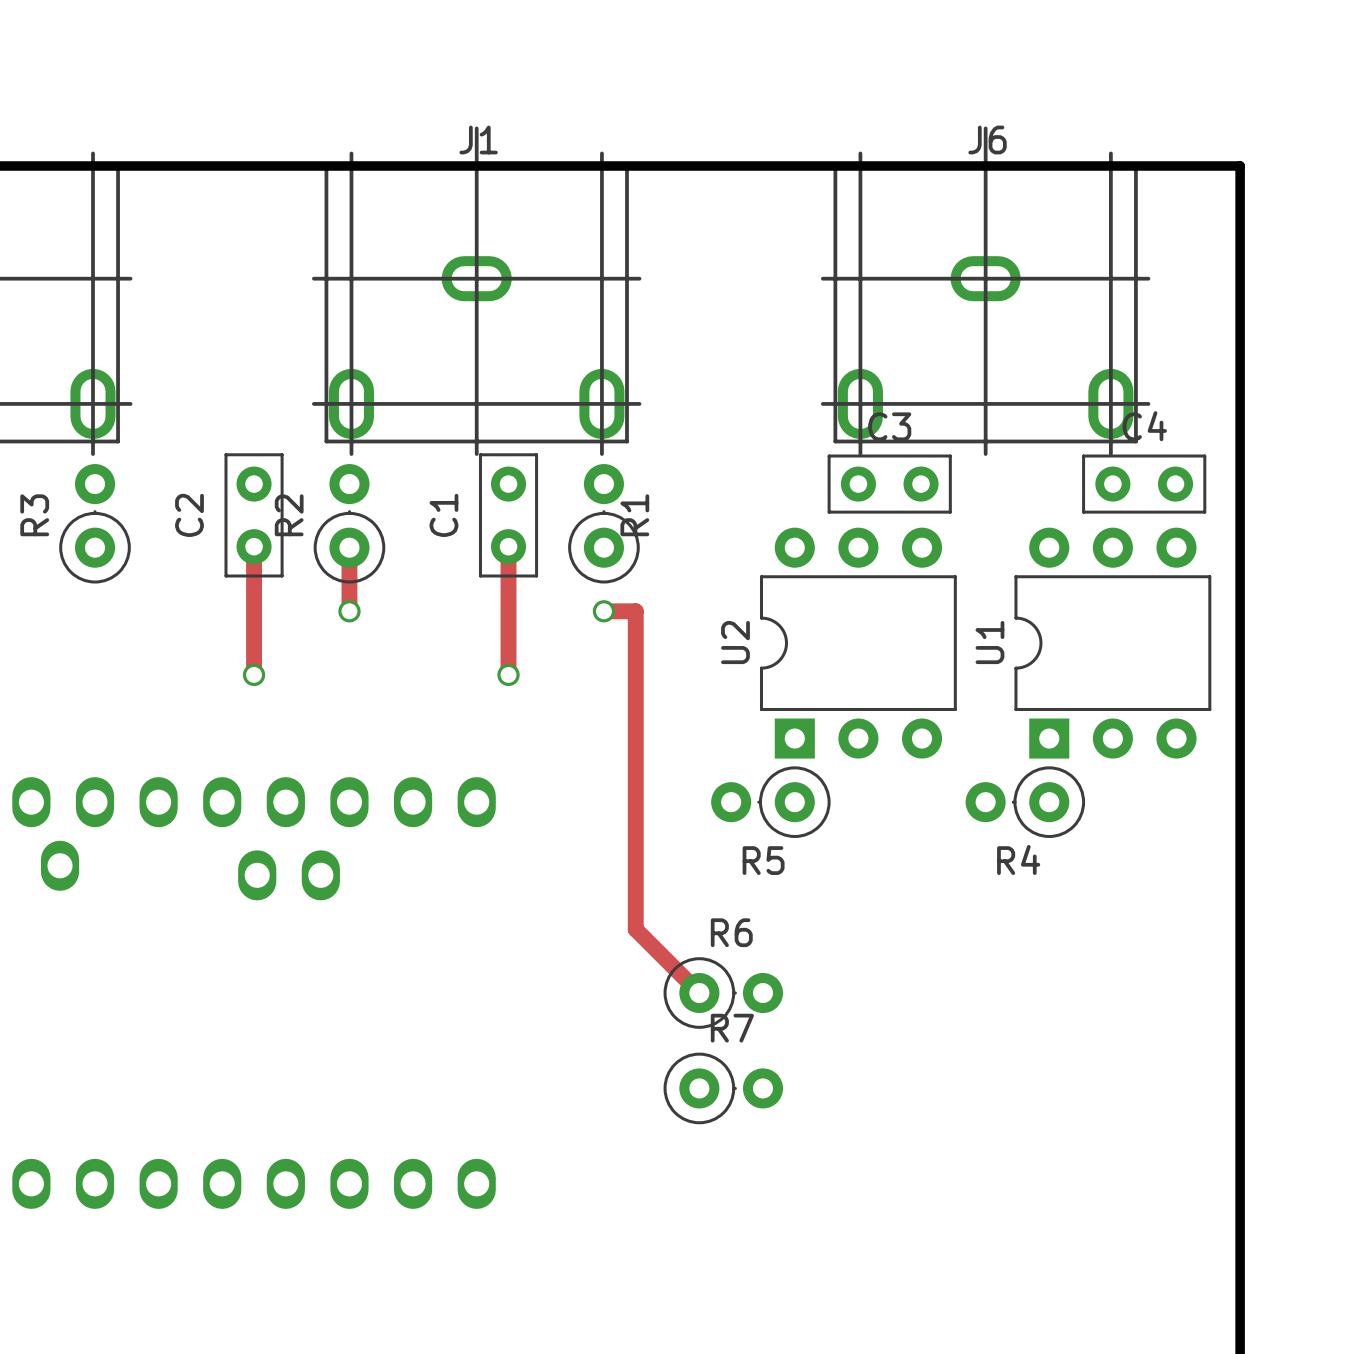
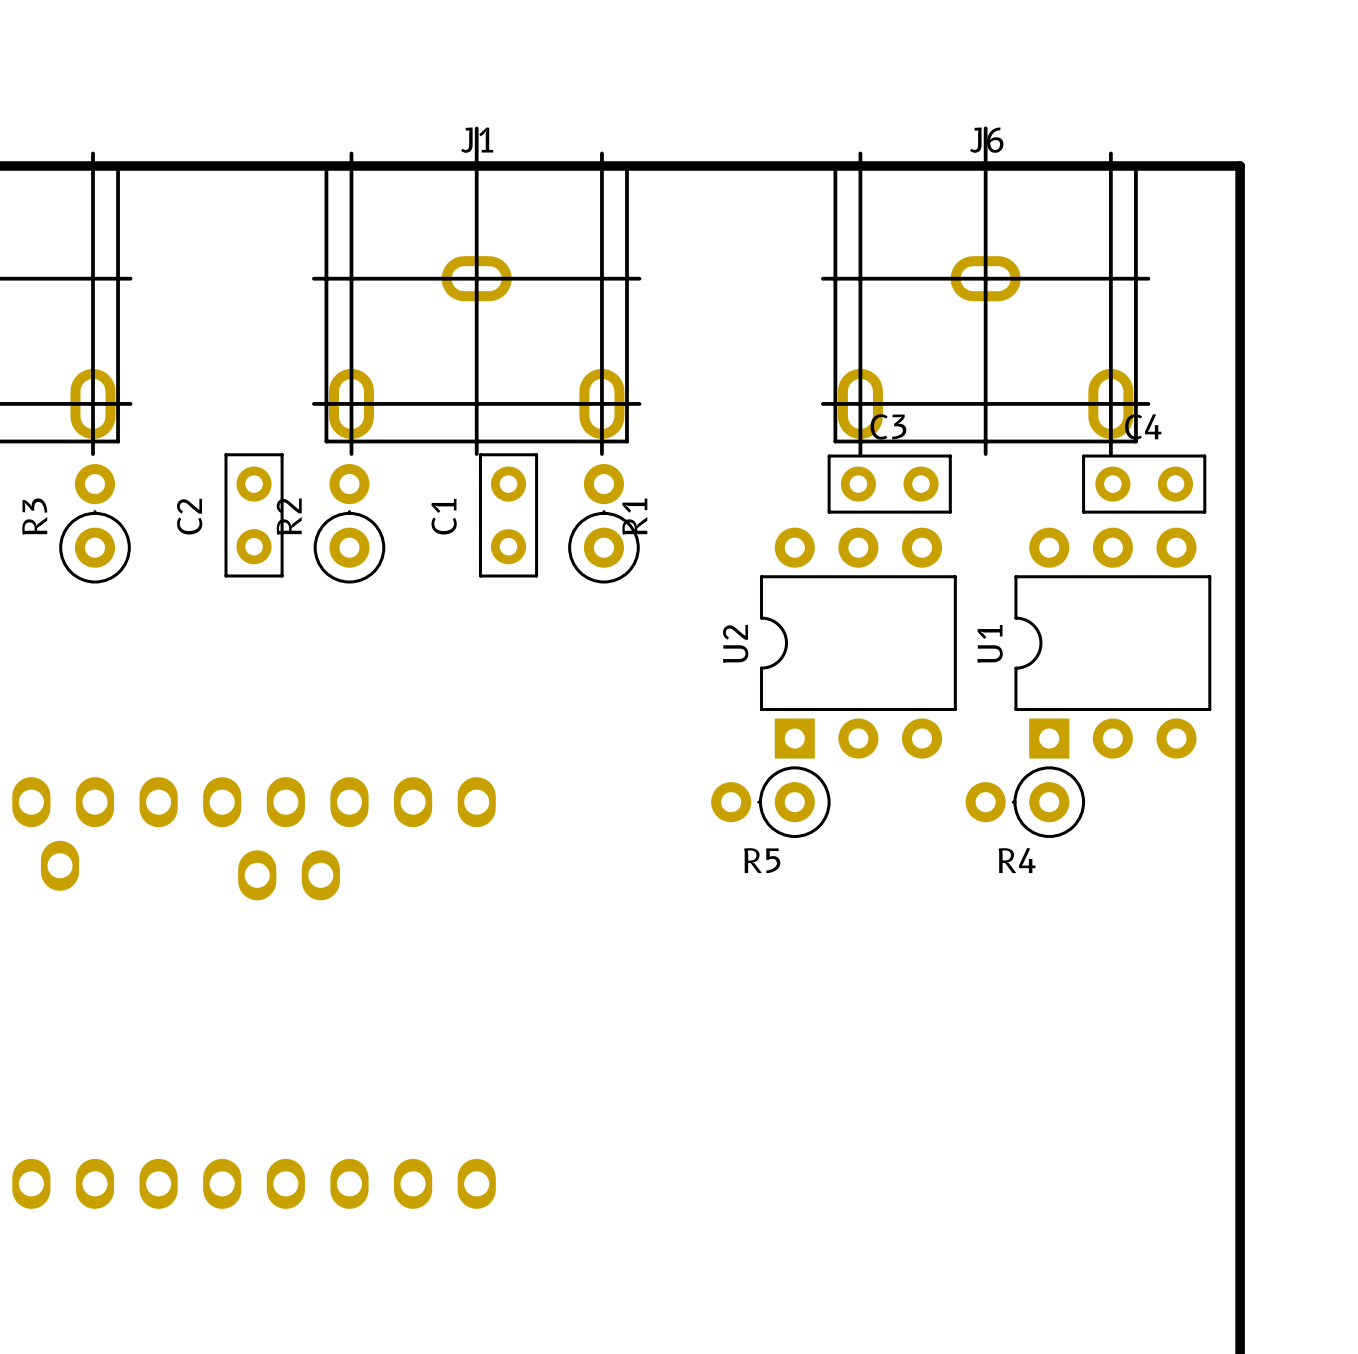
track: (254, 546) (254, 674) -> none
track: (508, 546) (508, 674) -> none
track: (349, 547) (349, 611) -> none
via: (349, 611) -> none
track: (603, 611) (635, 611) (635, 929) (699, 993) -> none
via: (603, 611) -> none
via: (254, 674) -> none
via: (508, 674) -> none
R6: (723, 993) -> none
R7: (723, 1088) -> none

